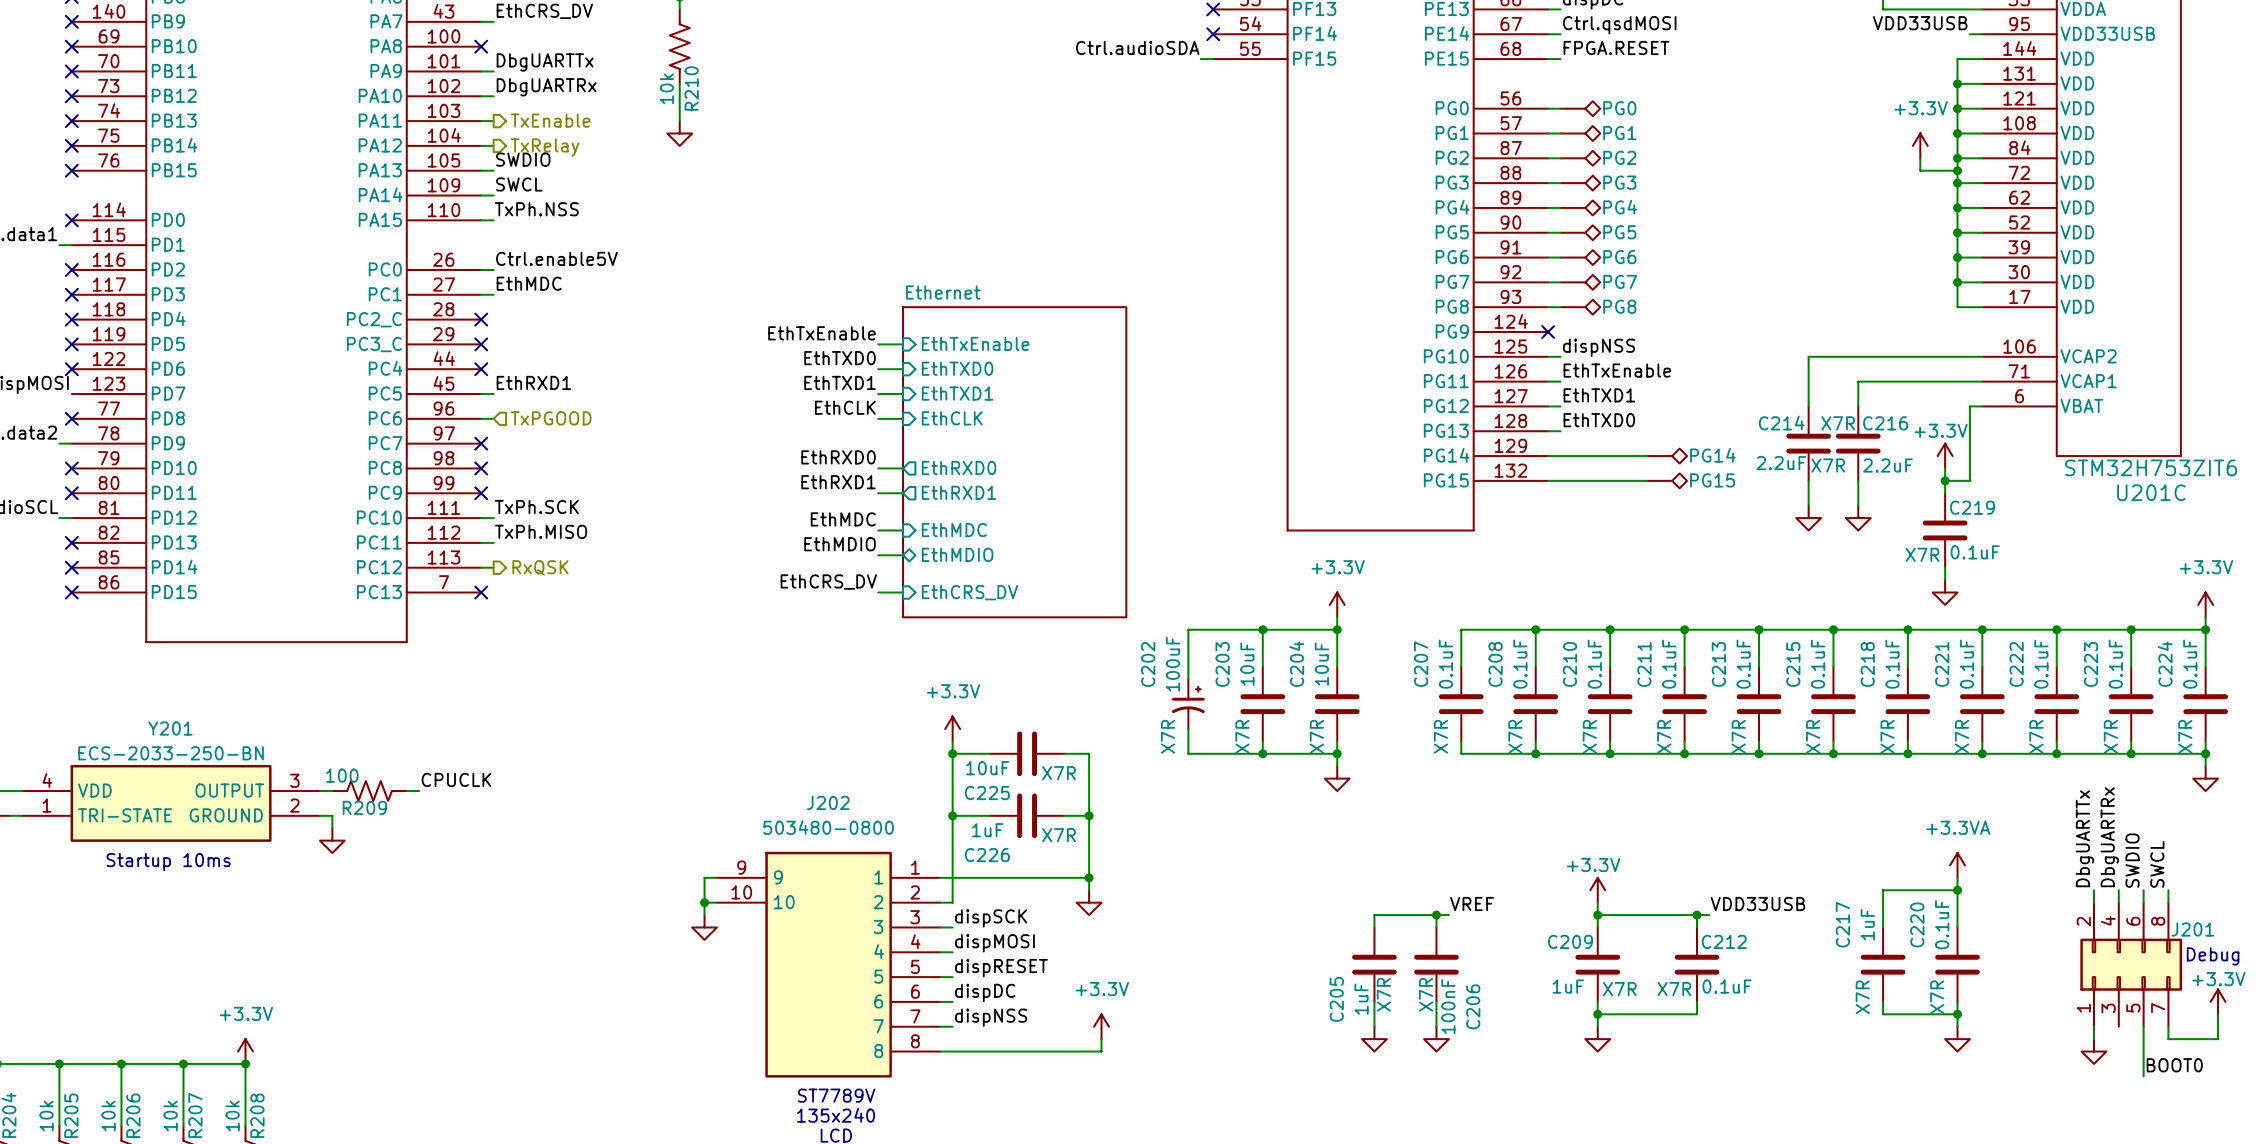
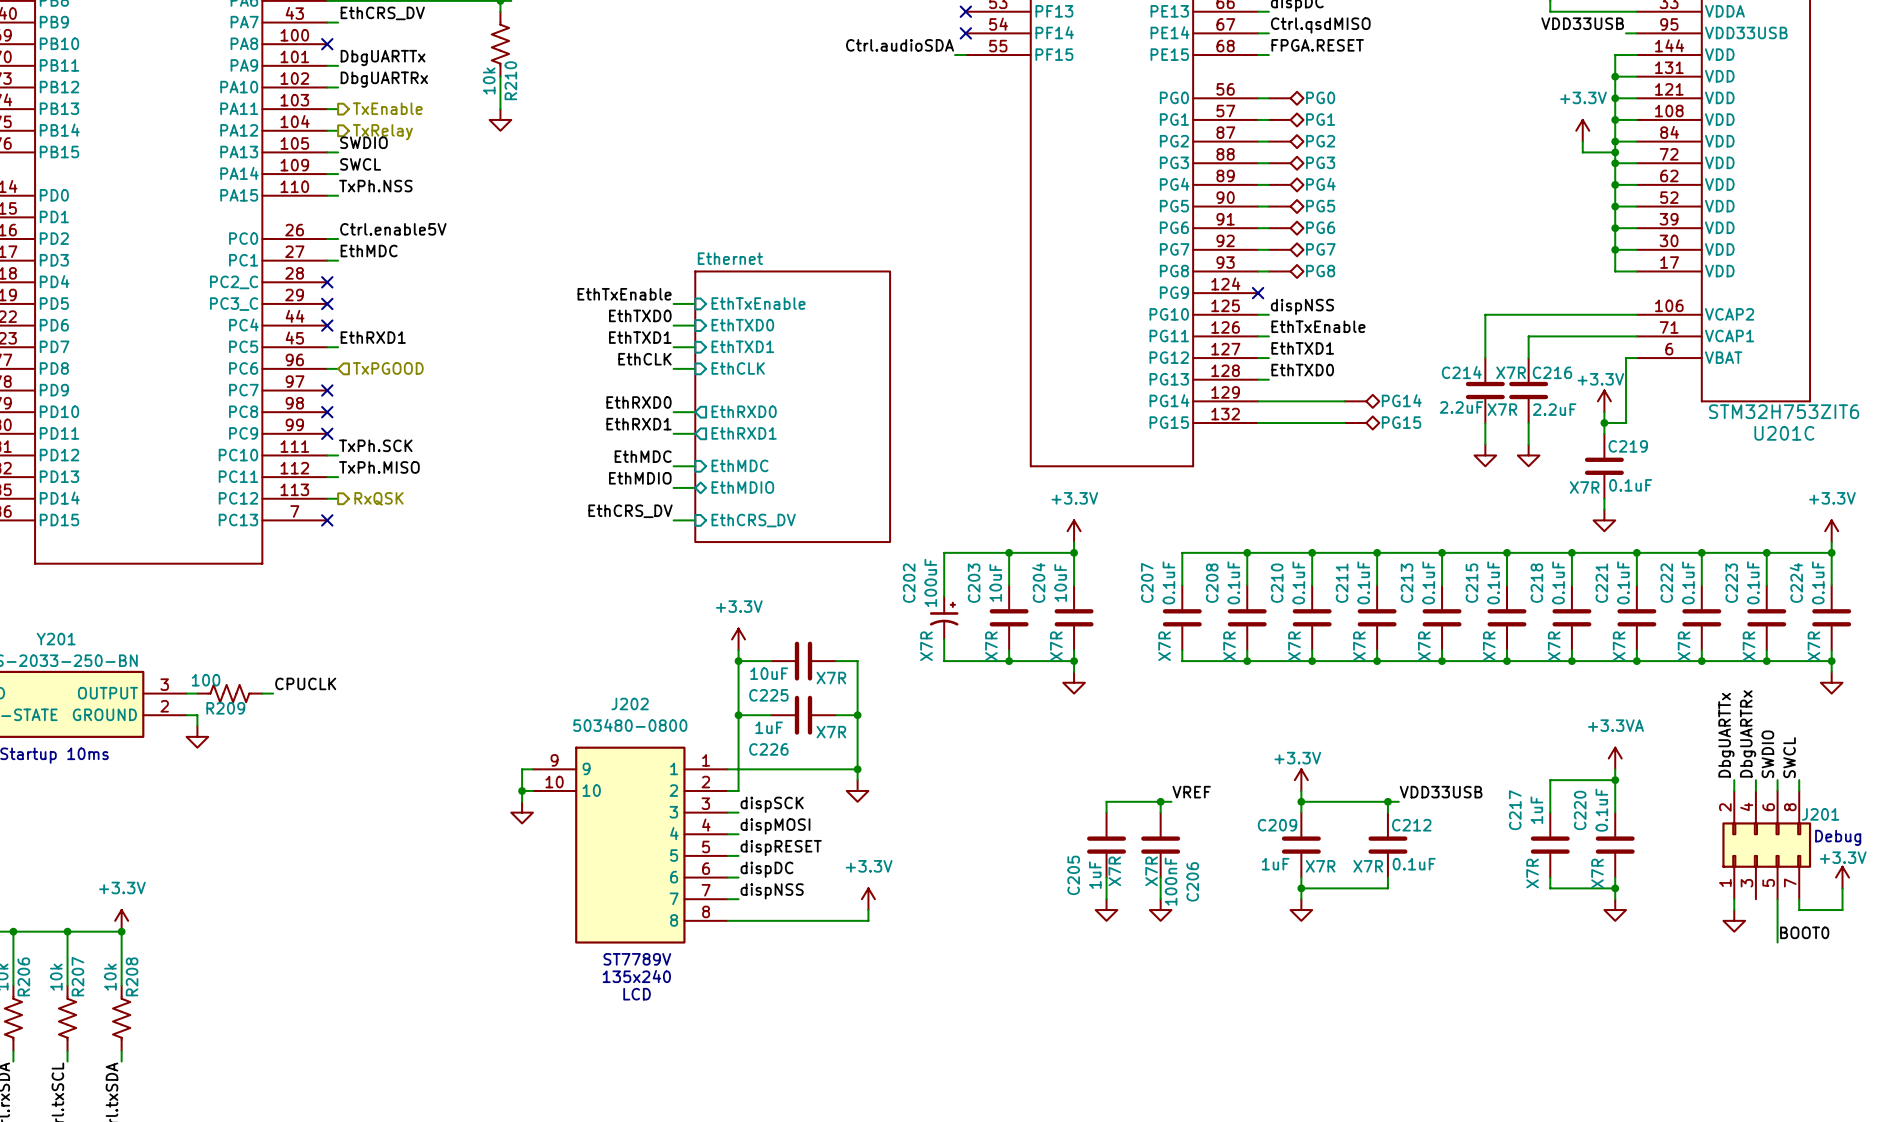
label: Ctrl.qsdMOSI (1619, 25) -> Ctrl.qsdMISO (1320, 25)

